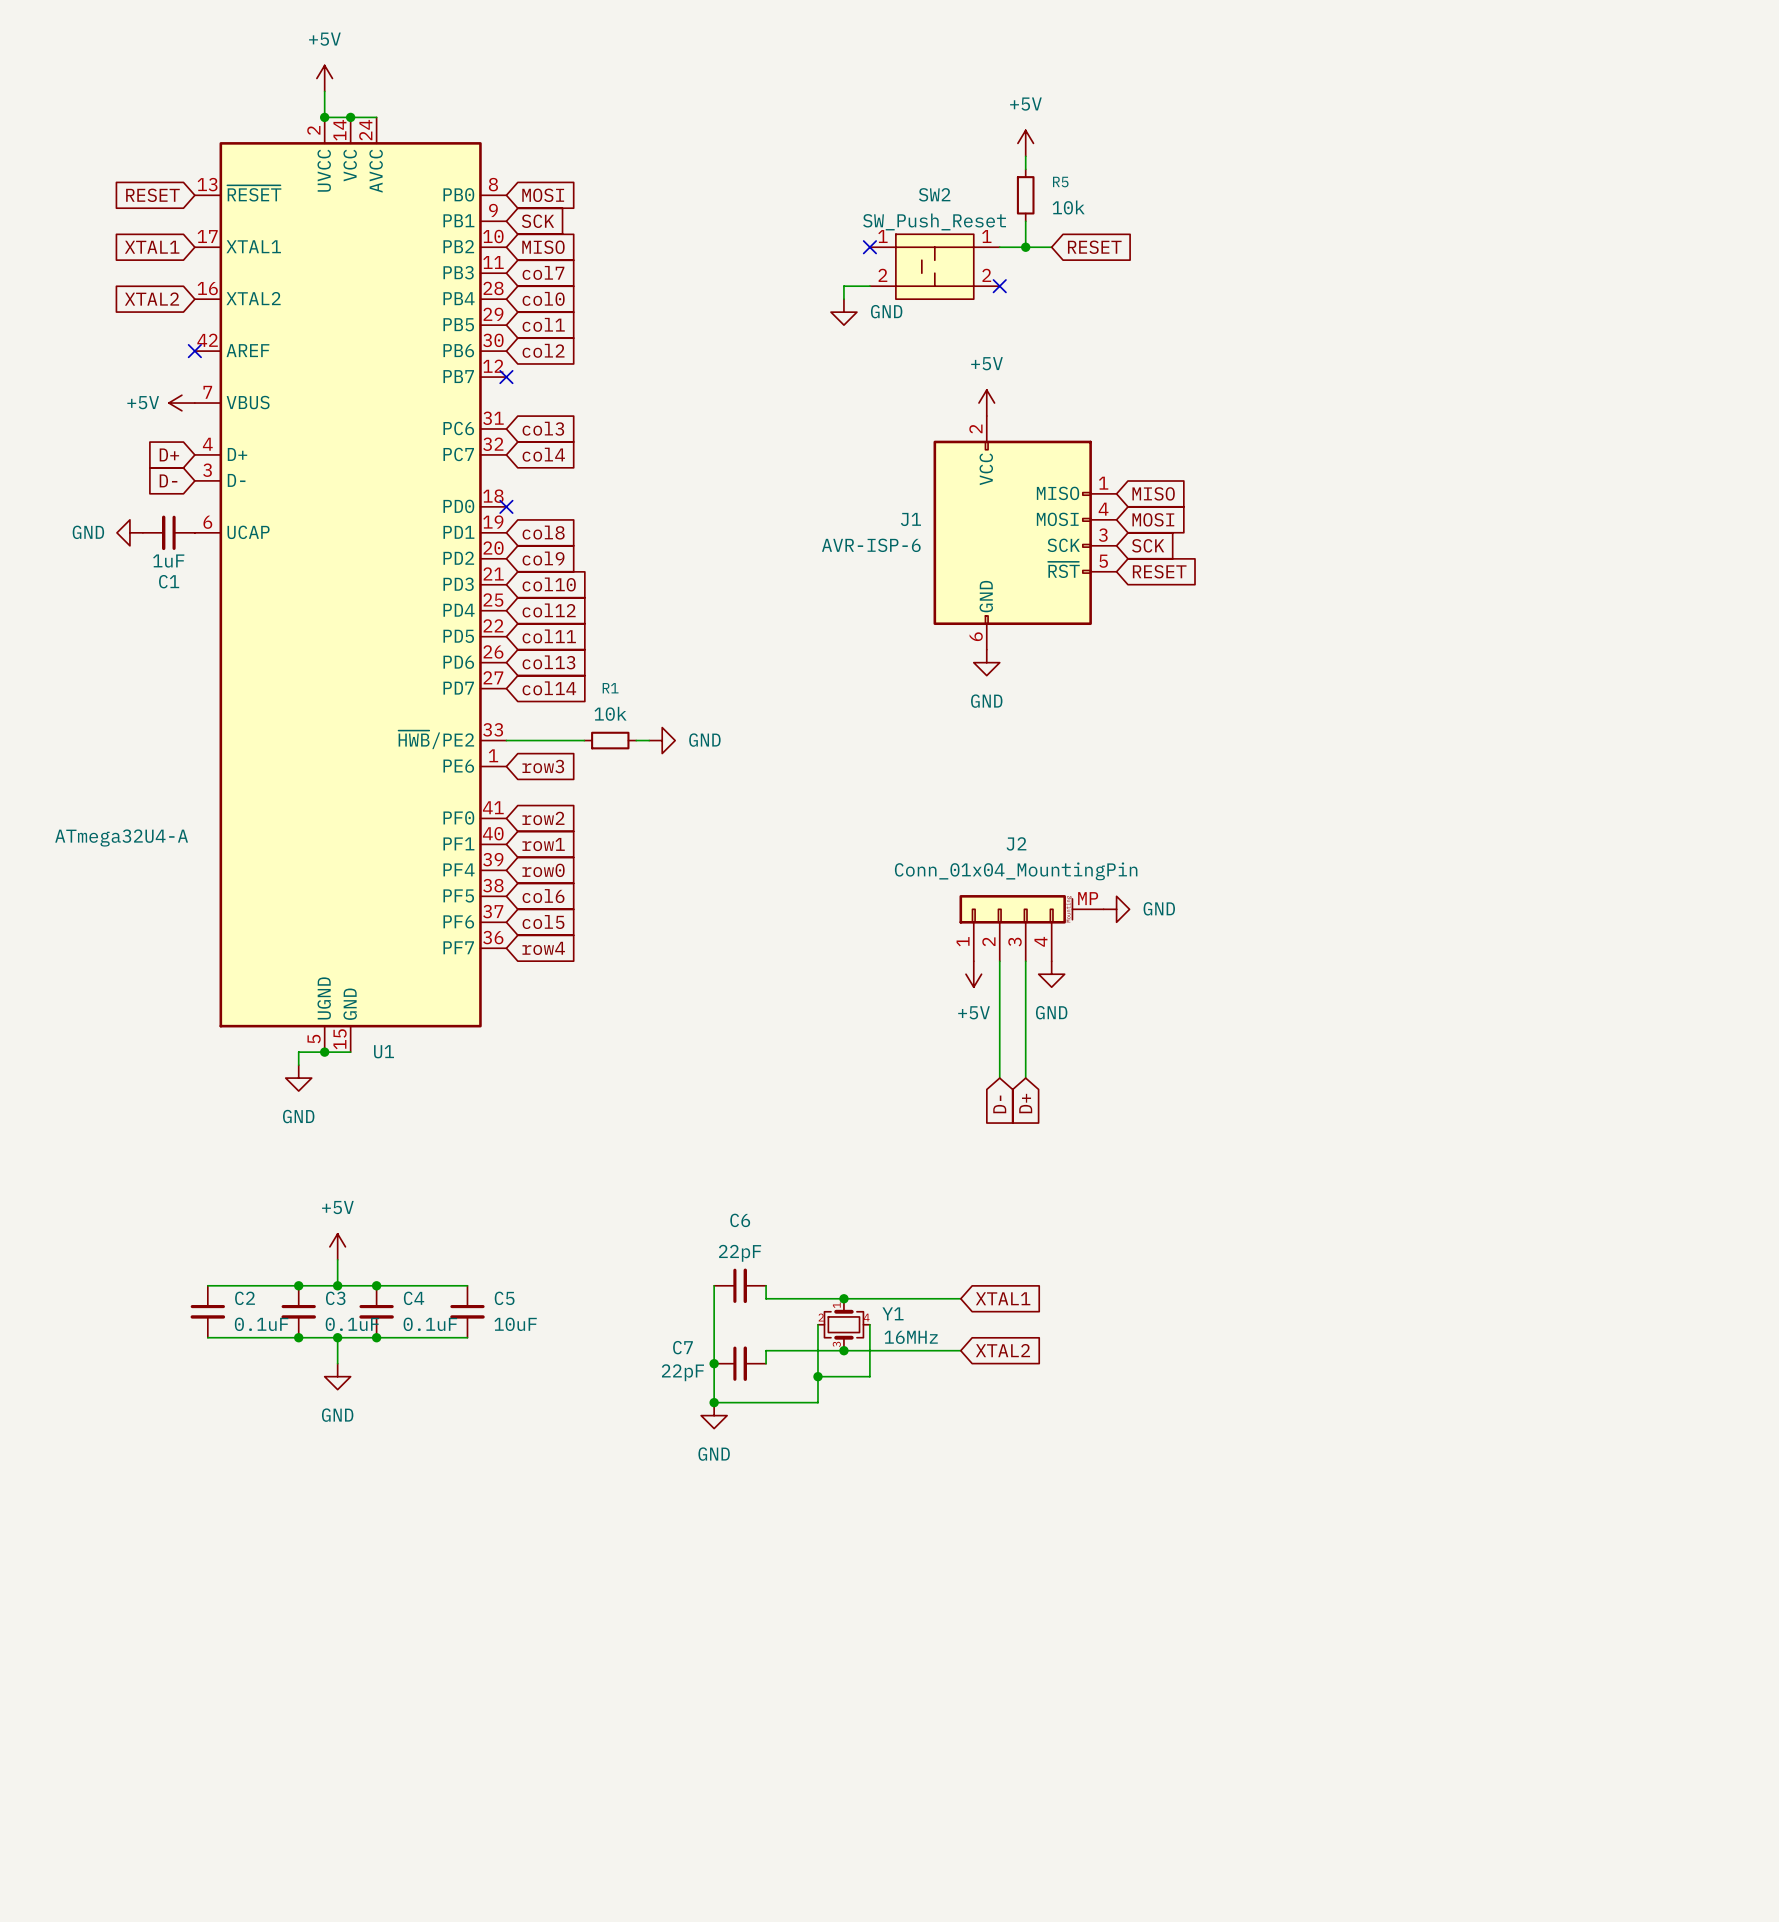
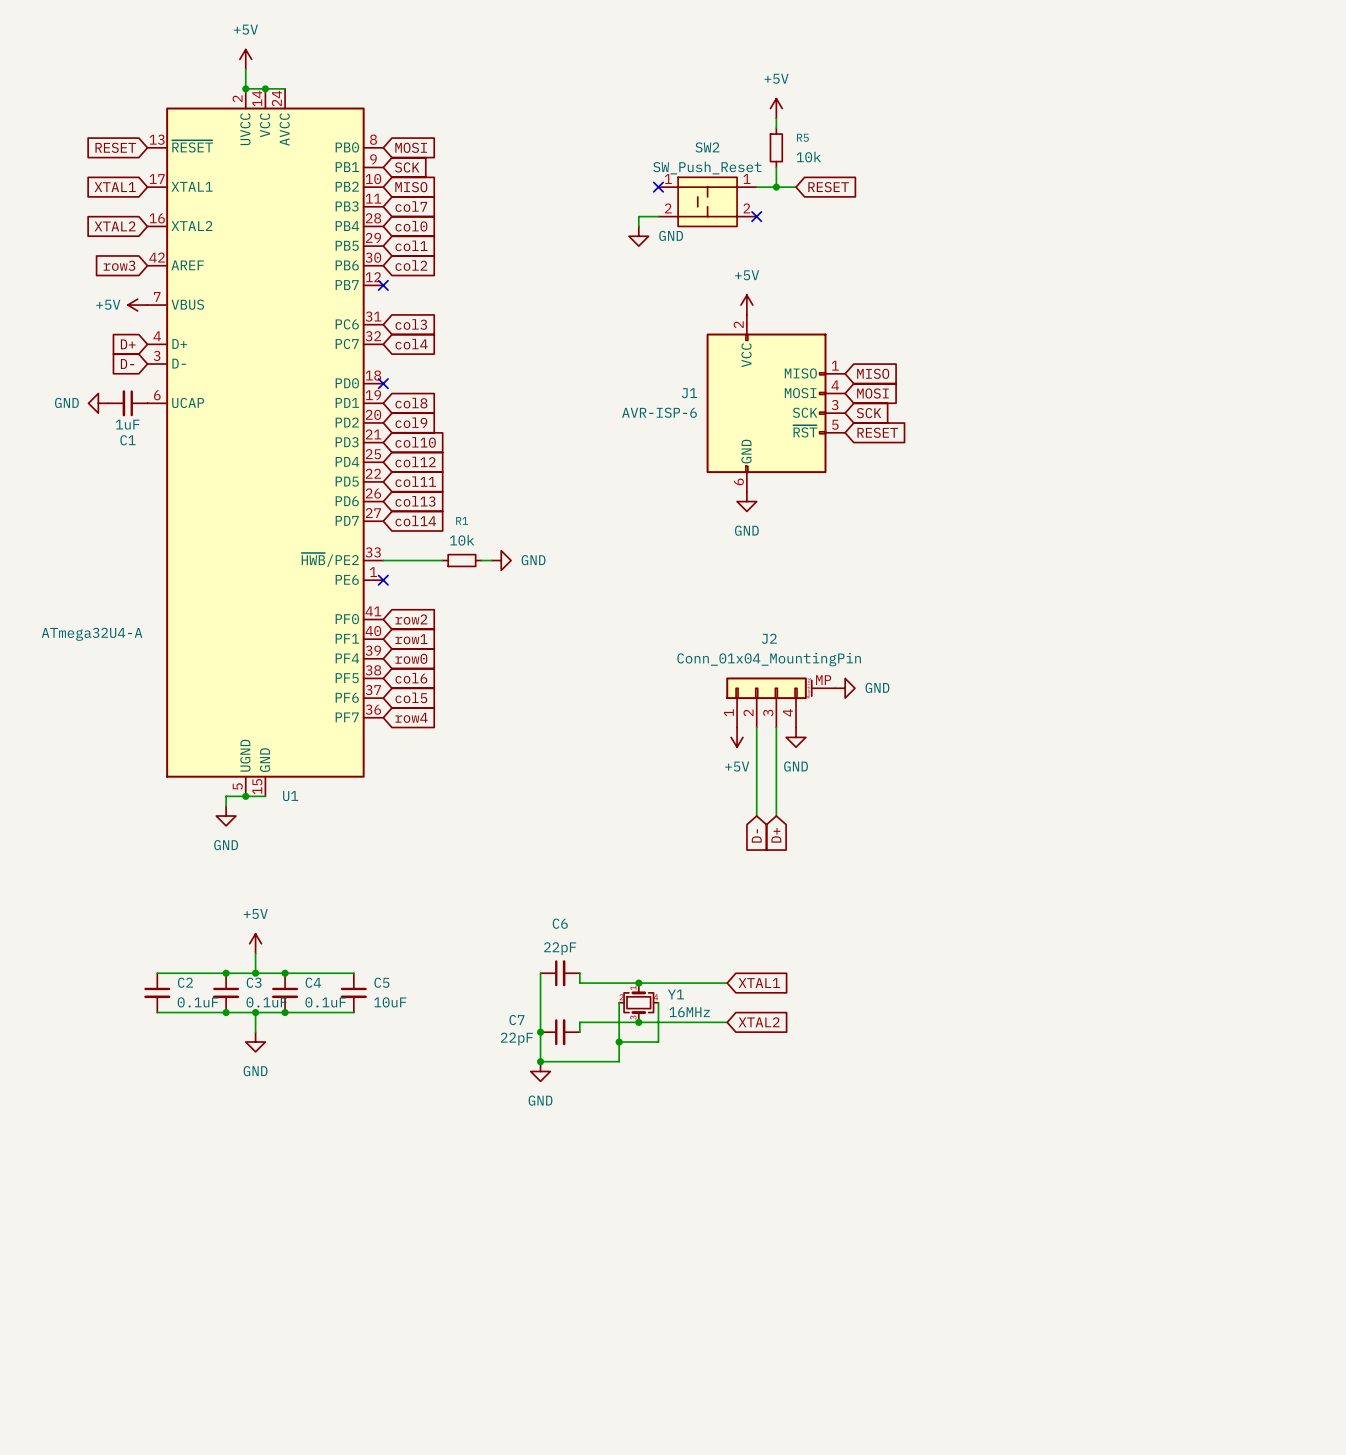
global label: none -> row3 (119, 265)
no-connect mark: (194, 351) -> none
no-connect mark: none -> (383, 580)
global label: row3 (543, 766) -> none

